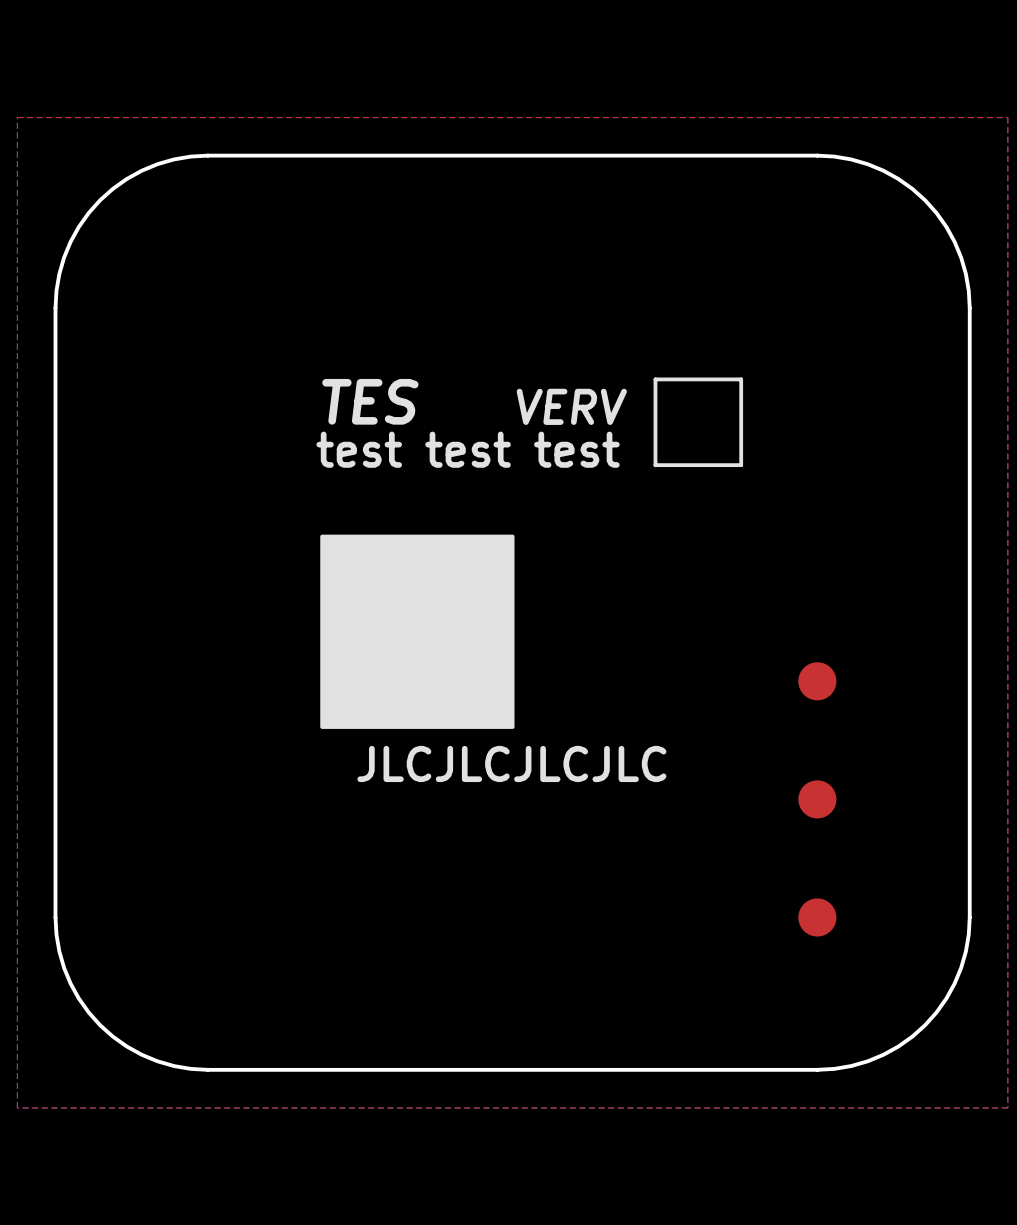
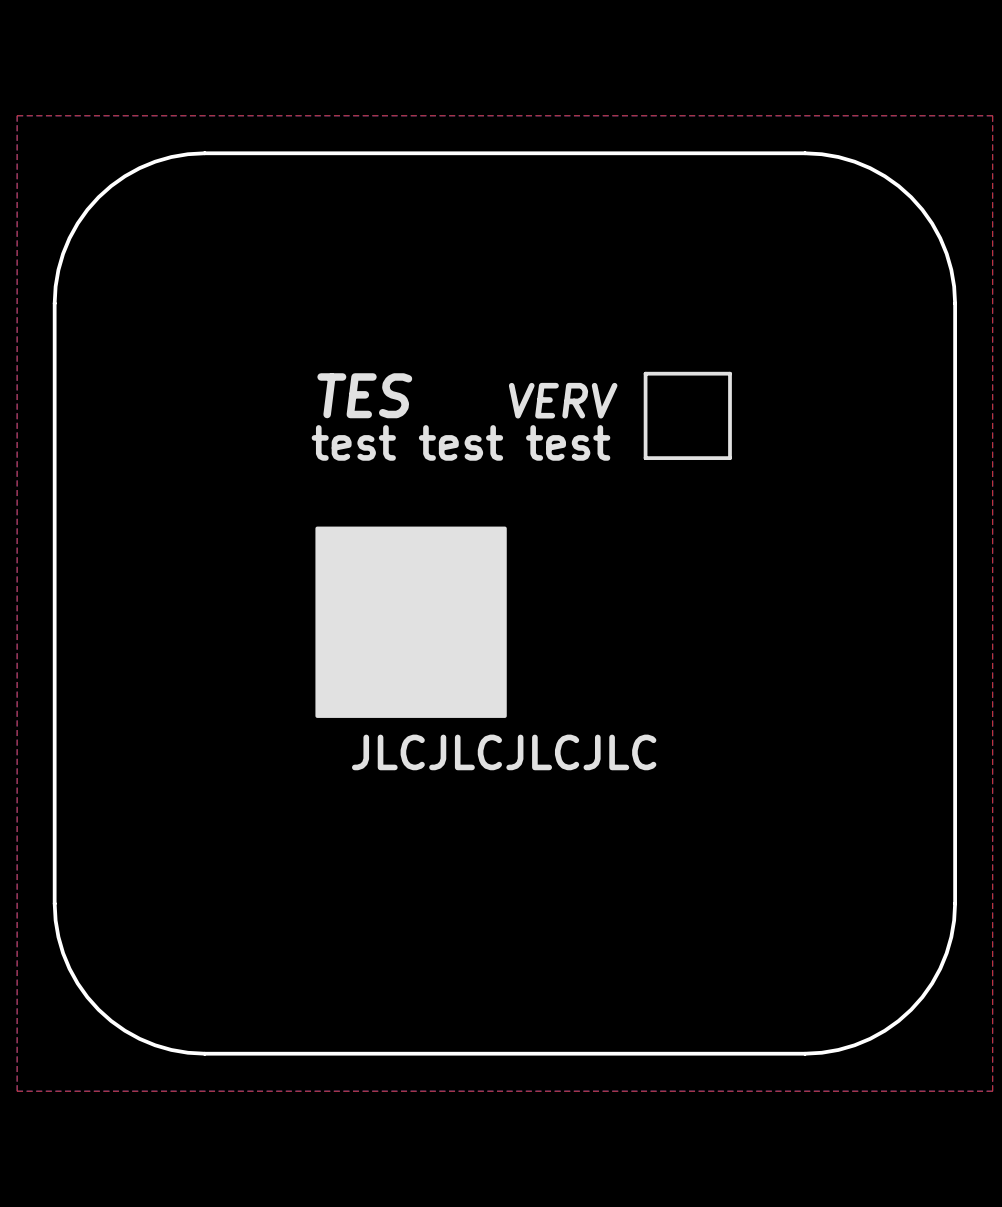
part: (817, 681) -> none
part: (817, 799) -> none
part: (817, 917) -> none

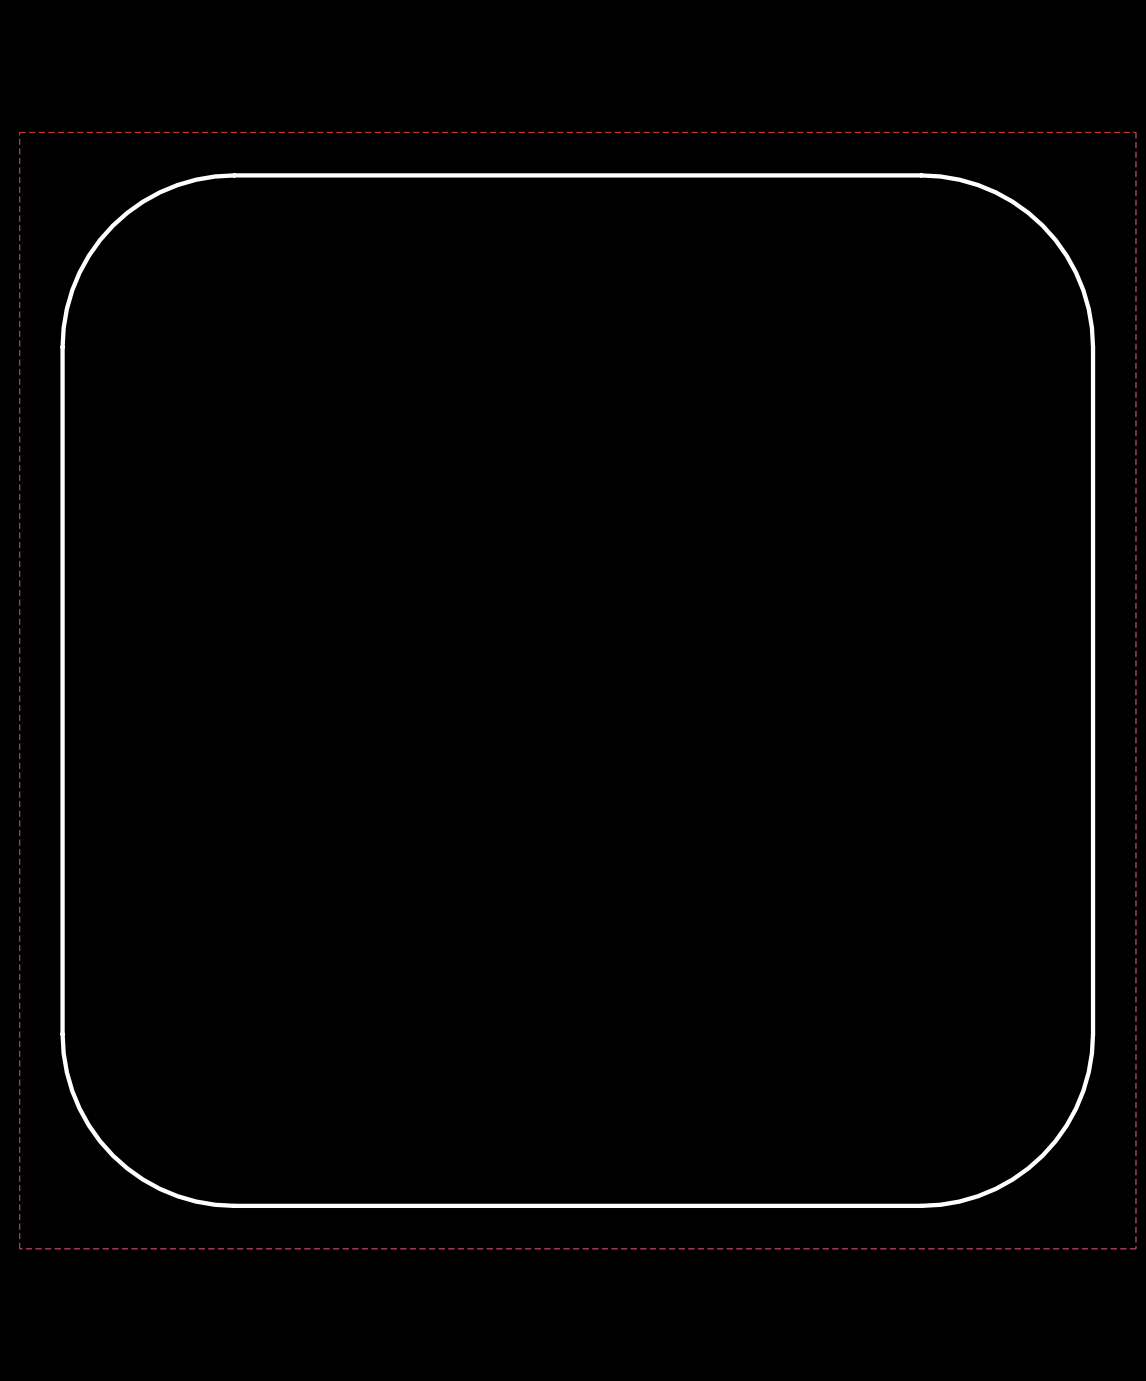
line: (645, 373) (730, 373) (730, 458) (645, 458) (645, 373) -> none
text: TES (364, 395) -> none
text: VERV (563, 400) -> none
text: test test test (460, 442) -> none
drawing: [315, 526, 507, 718] -> none
text: JLCJLCJLCJLC (504, 752) -> none

